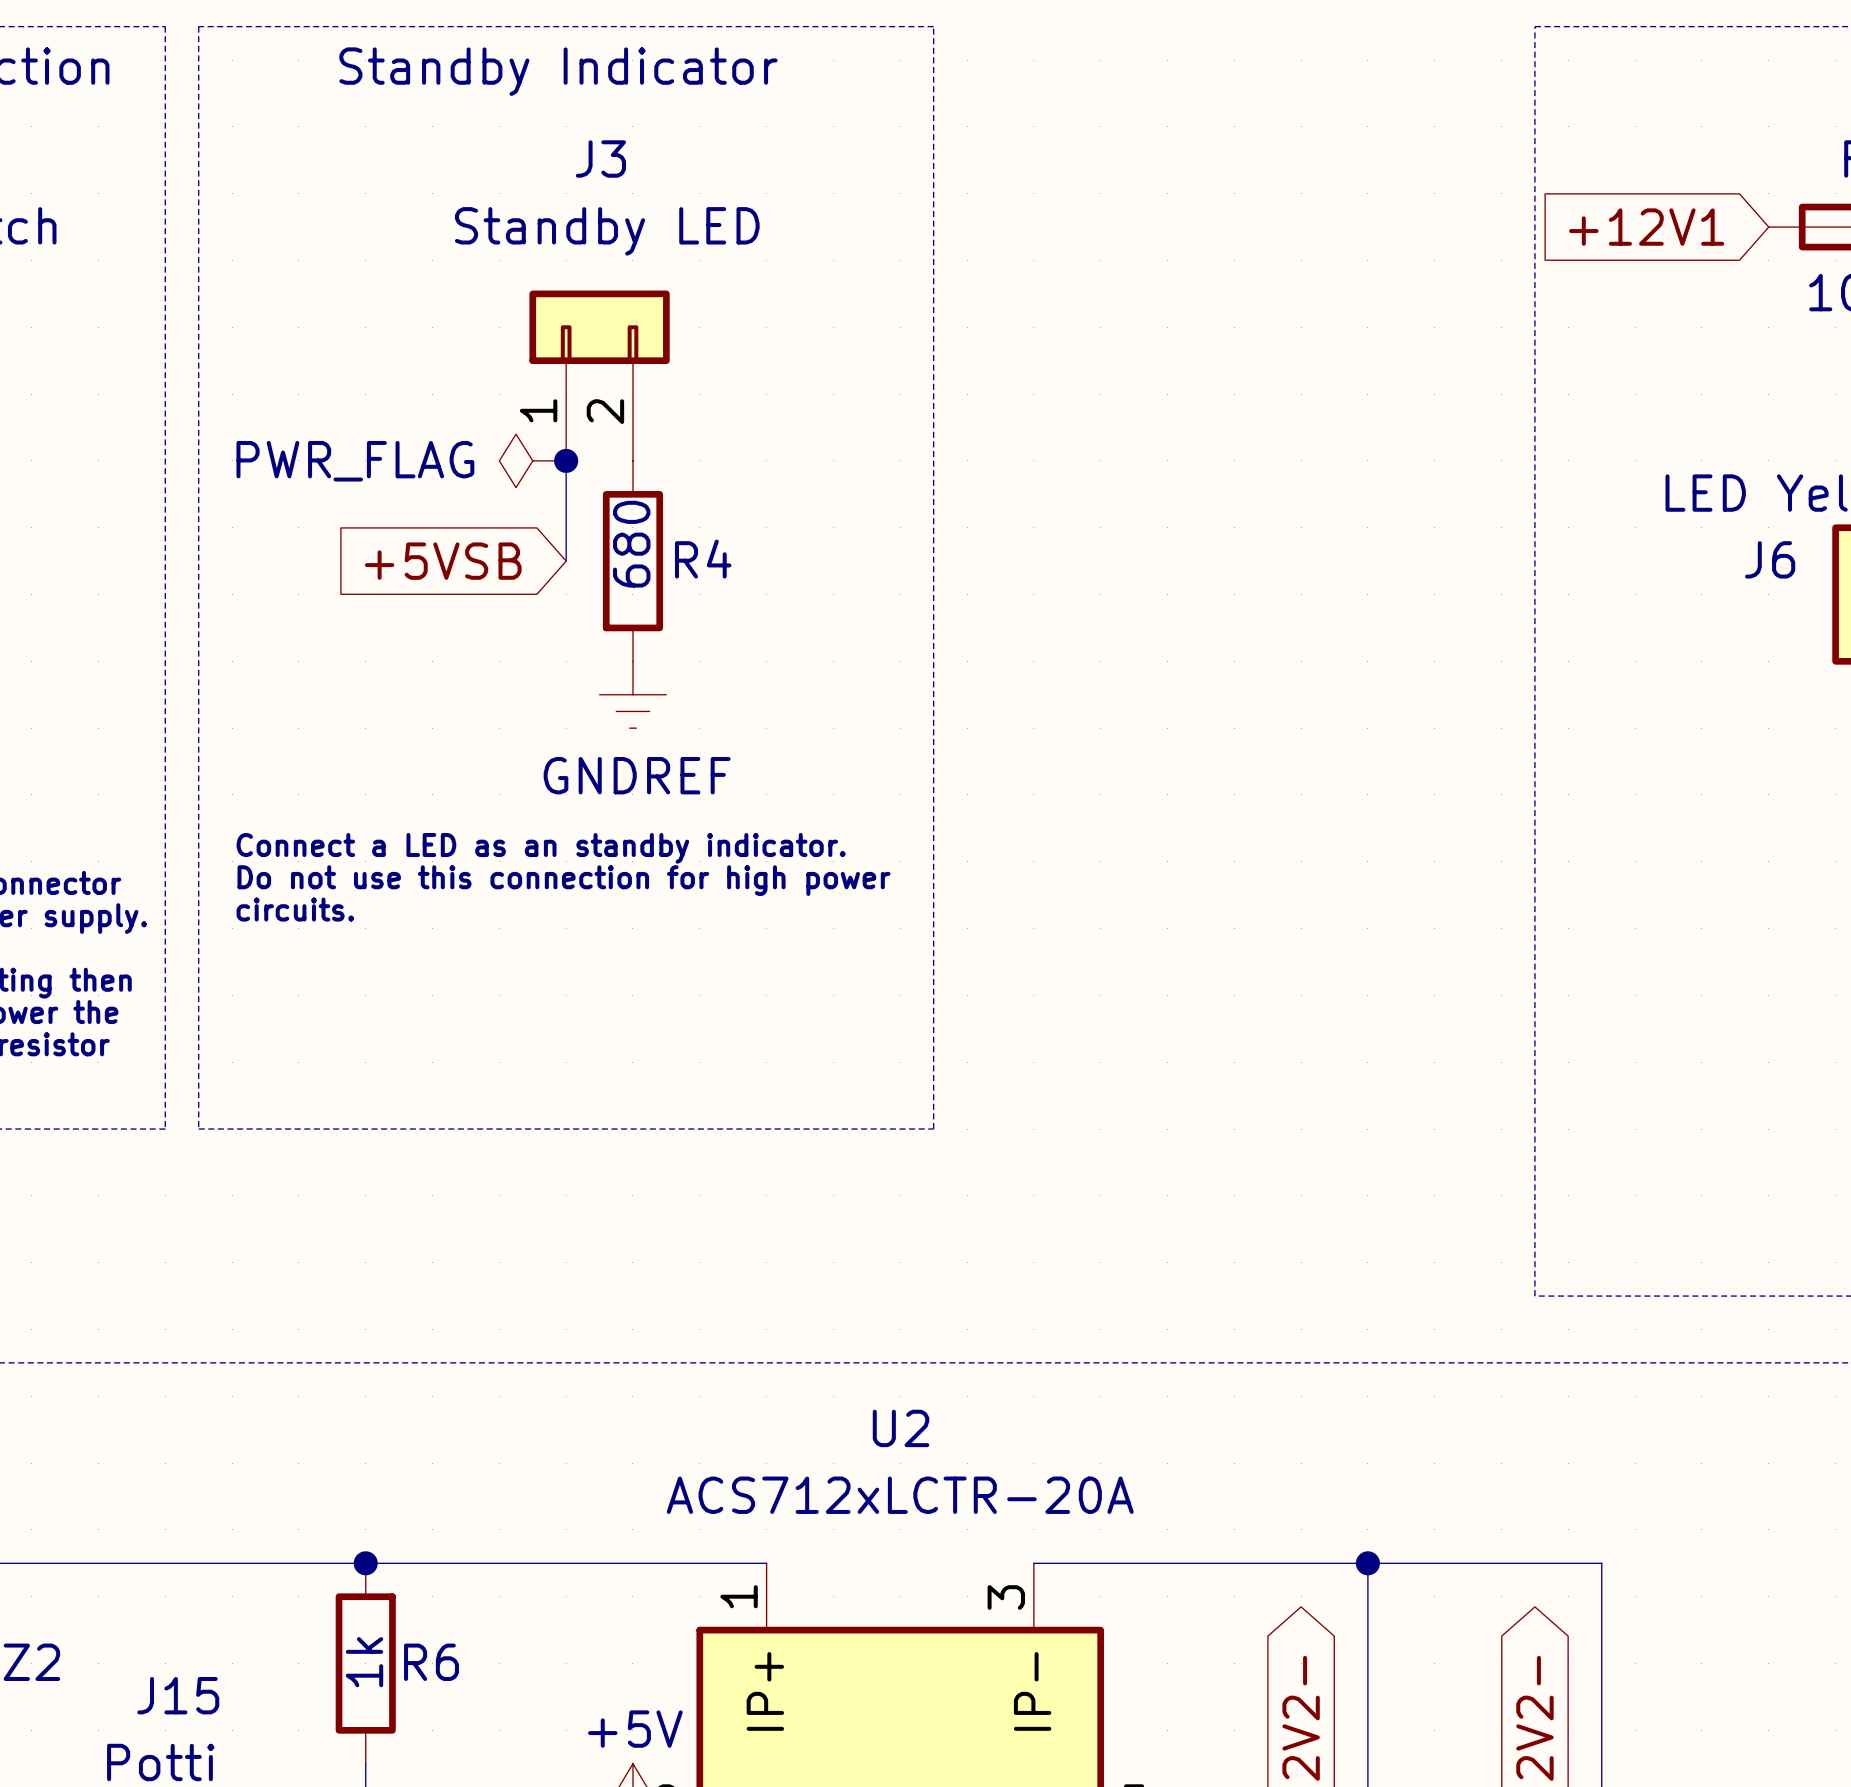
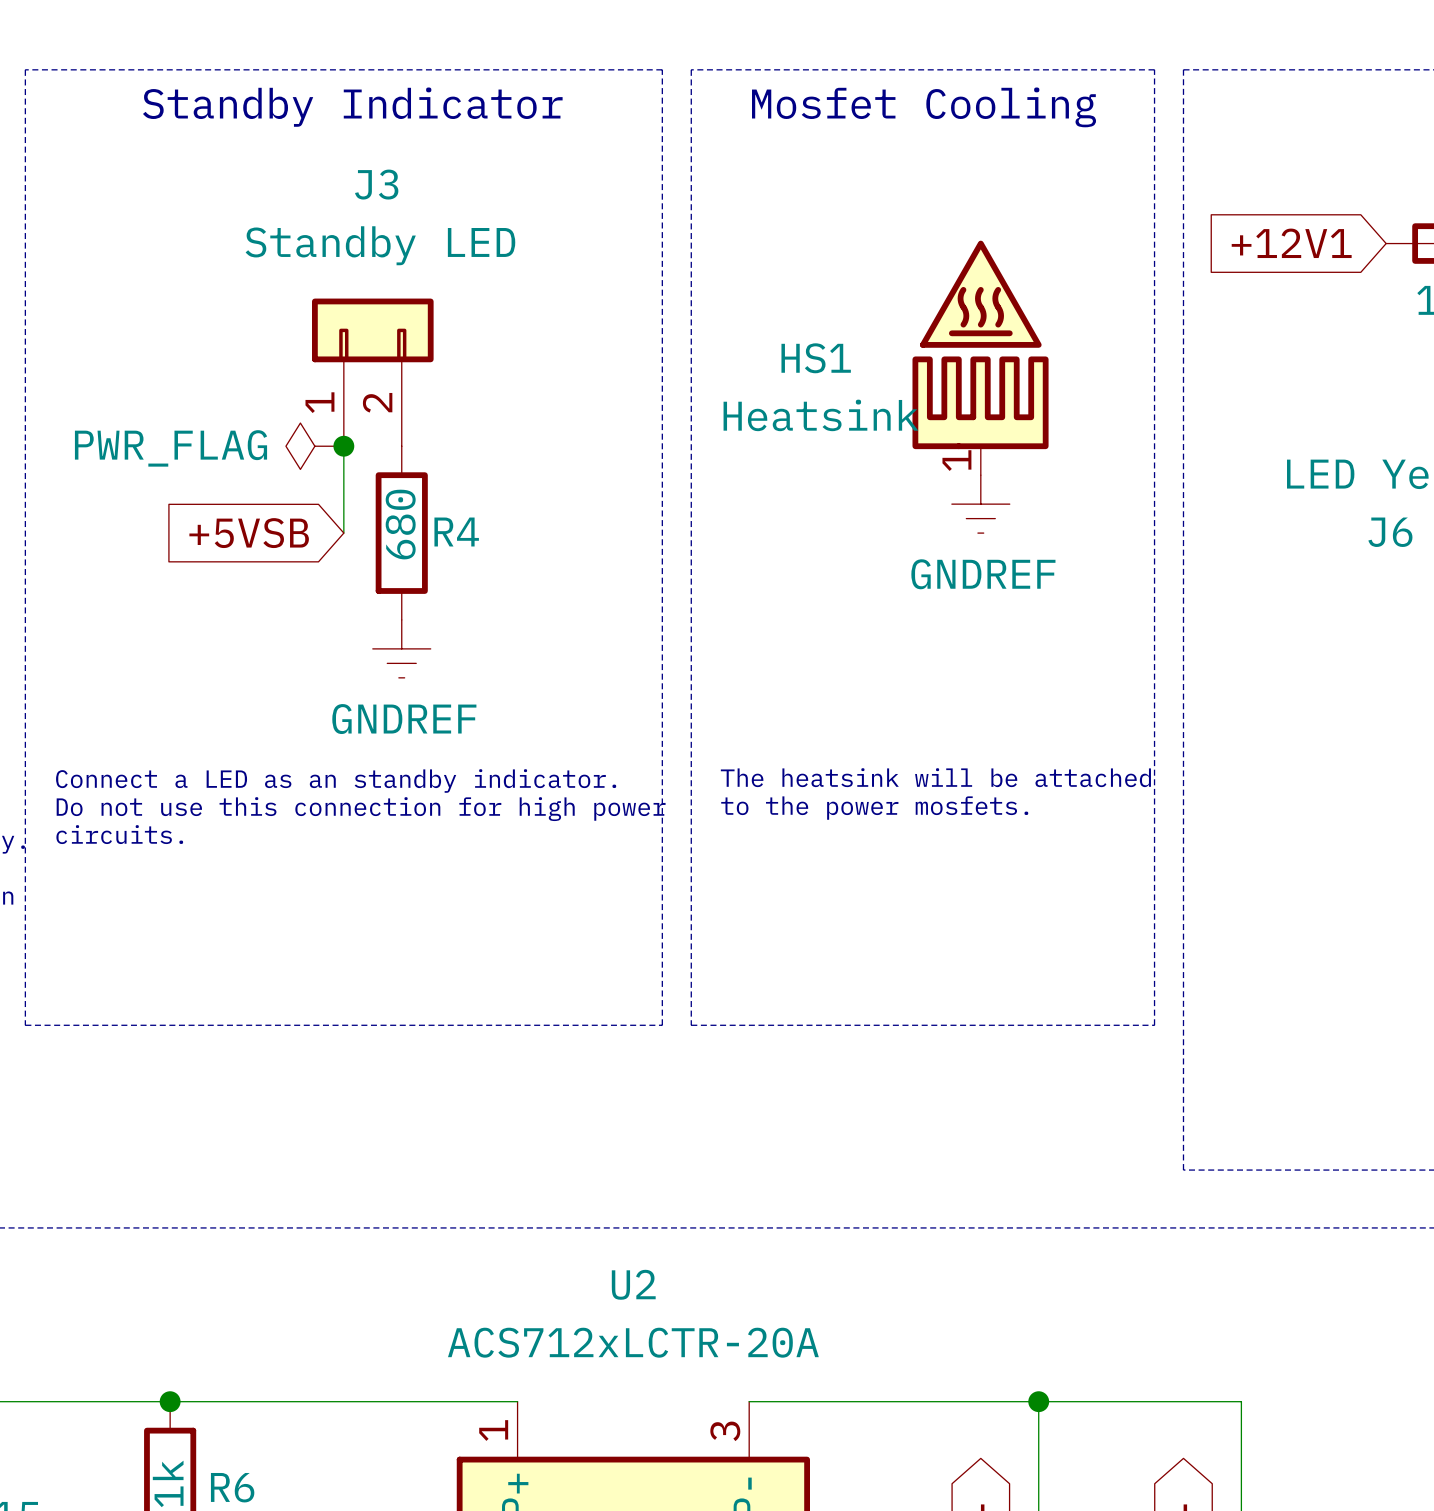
line: none -> (691, 69) (691, 1025) (1154, 1025) (1154, 69) (691, 69)
text: none -> Mosfet Cooling (924, 107)
power symbol: none -> (980, 294)
HS1: none -> Heatsink (980, 415)
power symbol: none -> GNDREF (980, 504)
text: none -> The heatsink will be attached (935, 777)
text: none -> to the power mosfets. (874, 808)

